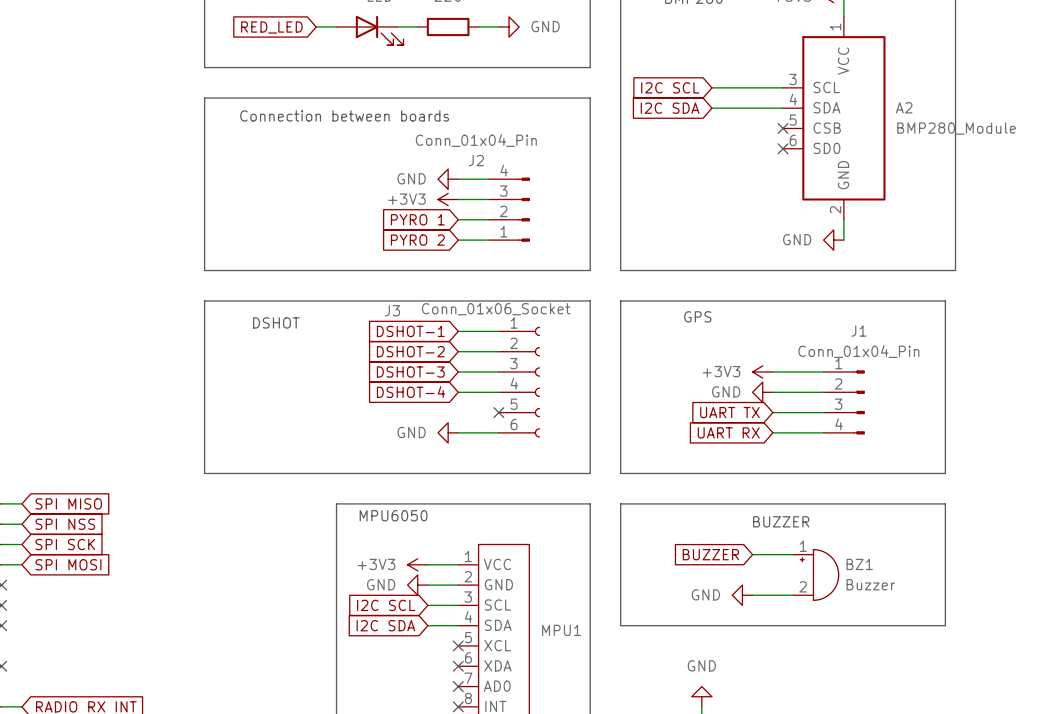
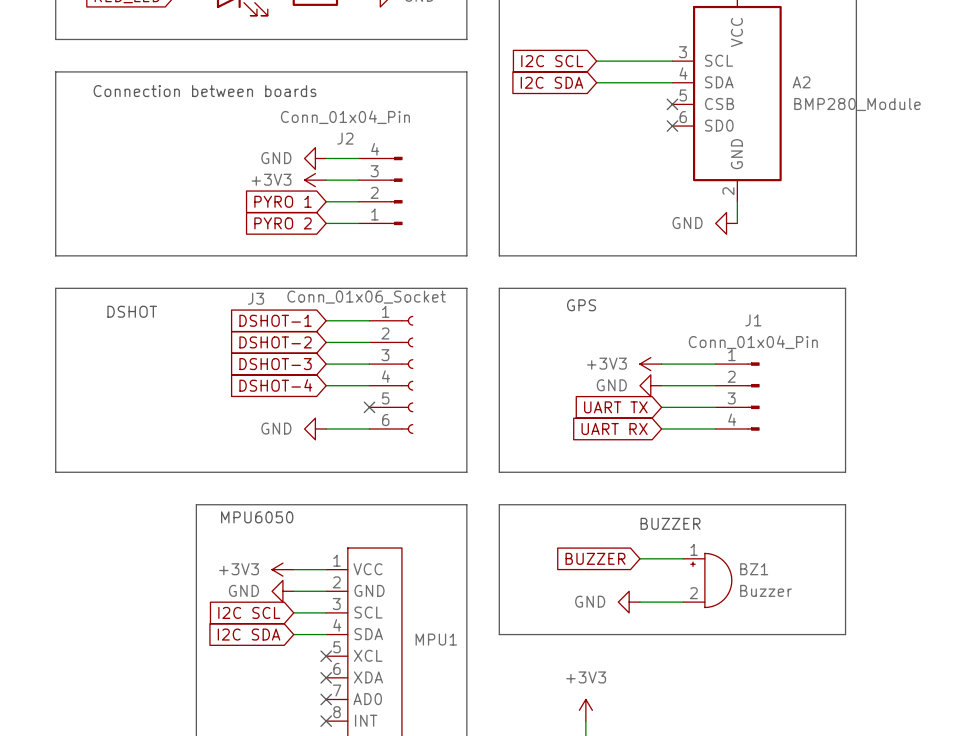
power symbol: GND (701, 696) -> +3V3 (585, 710)

